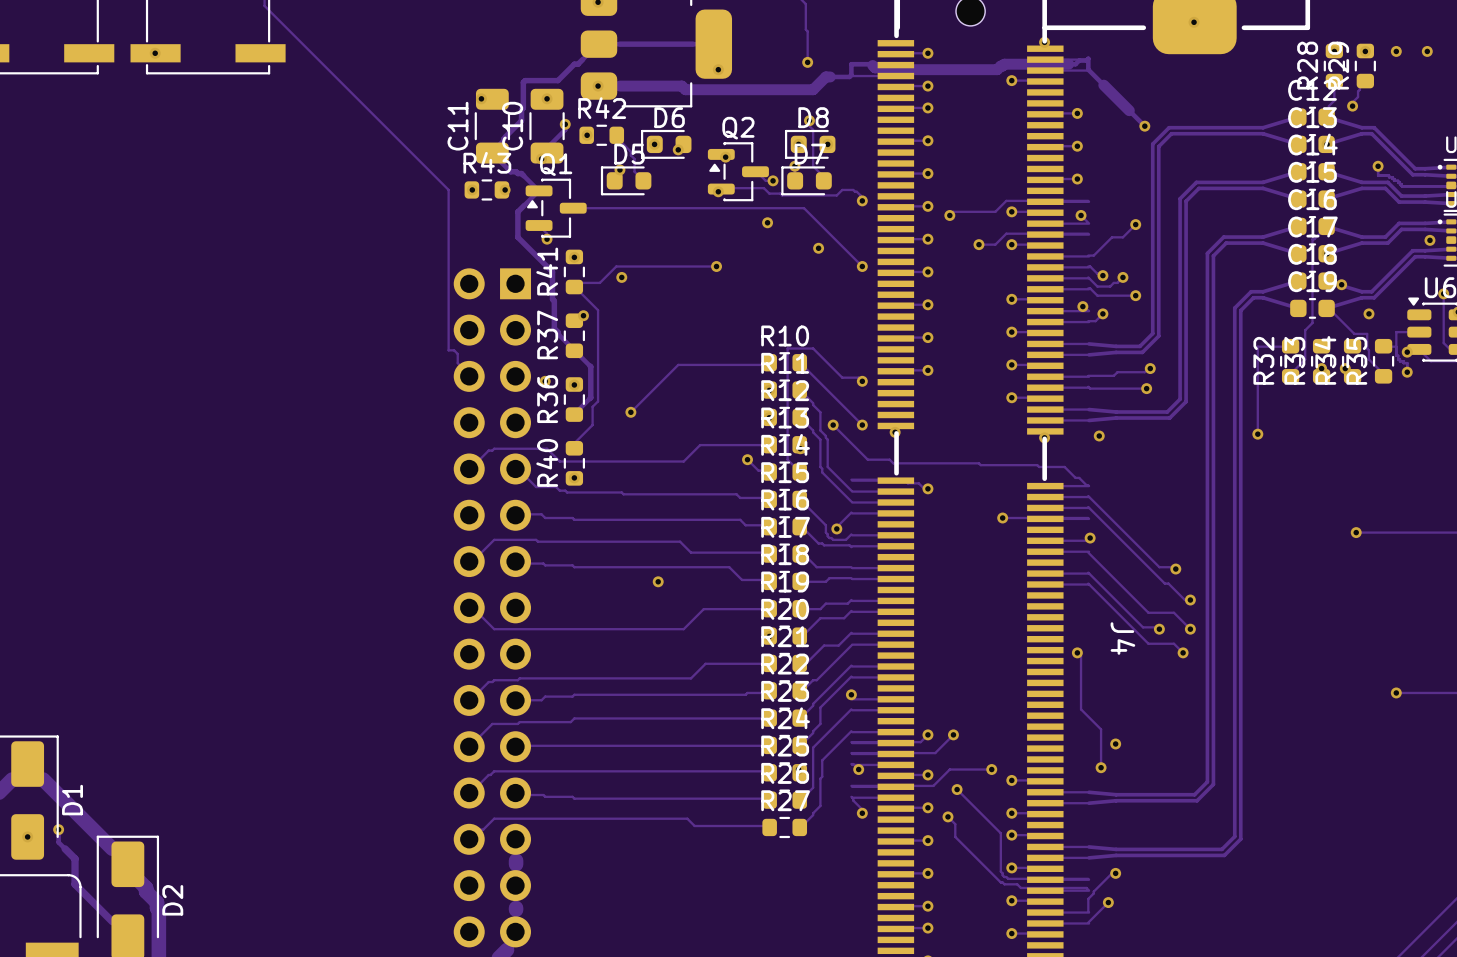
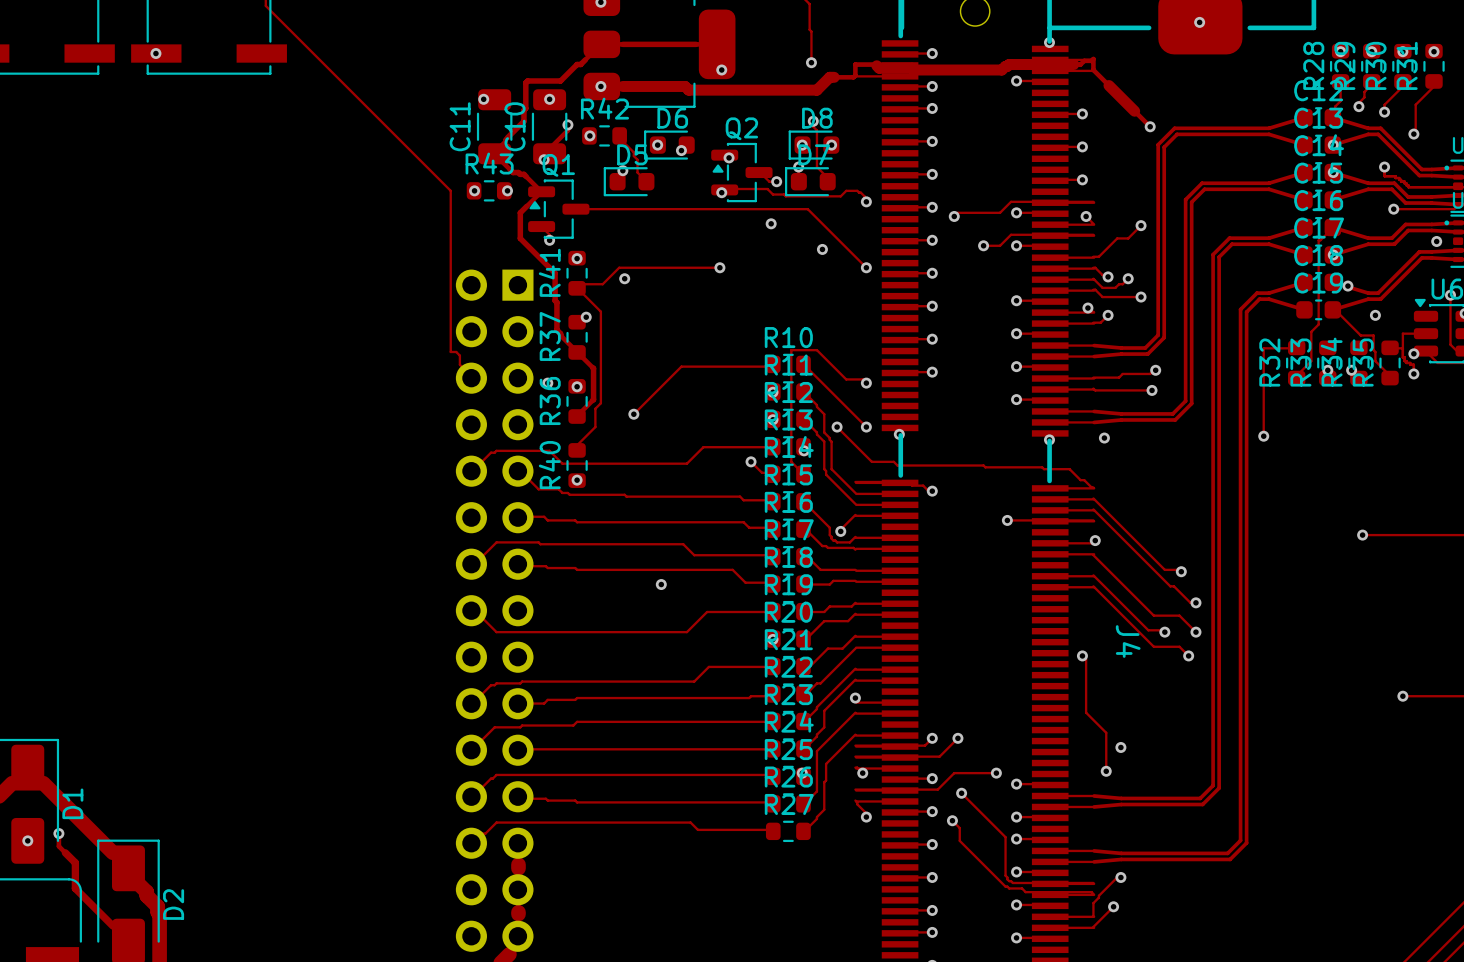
R30: none -> (1402, 66)
R31: none -> (1434, 66)
track: none -> (1402, 80) (1402, 86) (1384, 104) (1384, 112)
track: none -> (1434, 80) (1434, 86) (1415, 104) (1415, 130) (1413, 134)
via: none -> (1384, 112)
via: none -> (1413, 134)
via: none -> (1333, 172)
track: none -> (1457, 205) (1454, 209) (1393, 209)
via: none -> (1393, 209)

